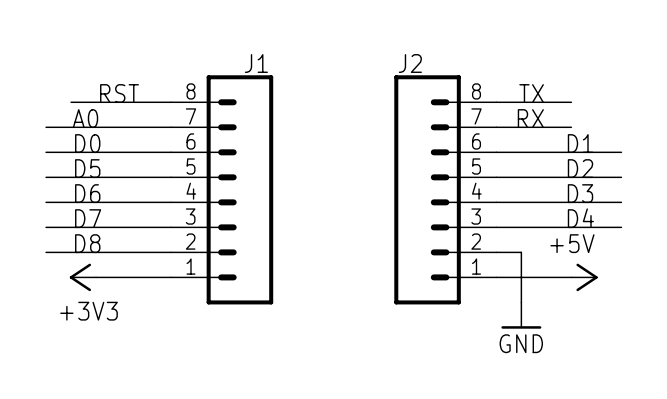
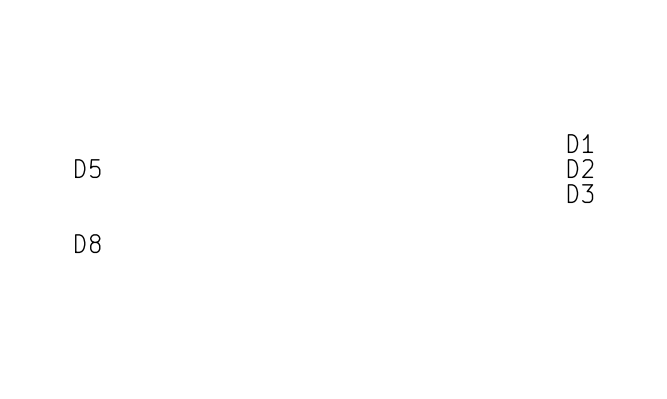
label: RST (119, 93) -> none
label: TX (531, 93) -> none
wire: (71, 102) (171, 102) -> none
wire: (496, 102) (571, 102) -> none
label: A0 (85, 118) -> none
label: RX (530, 118) -> none
wire: (46, 127) (171, 127) -> none
wire: (496, 127) (571, 127) -> none
label: D0 (87, 143) -> none
wire: (46, 152) (171, 152) -> none
wire: (496, 152) (621, 152) -> none
wire: (46, 177) (171, 177) -> none
wire: (496, 177) (621, 177) -> none
J1: (222, 189) -> none
J2: (445, 189) -> none
label: D6 (87, 193) -> none
wire: (46, 202) (171, 202) -> none
wire: (496, 202) (621, 202) -> none
label: D7 (88, 218) -> none
label: D4 (580, 218) -> none
wire: (46, 227) (171, 227) -> none
wire: (496, 227) (621, 227) -> none
wire: (46, 252) (171, 252) -> none
wire: (496, 252) (521, 252) (521, 302) -> none
power symbol: +3V3 (82, 277) -> none
wire: (96, 277) (171, 277) -> none
wire: (496, 277) (571, 277) -> none
power symbol: +5V (584, 277) -> none
power symbol: GND (521, 315) -> none

